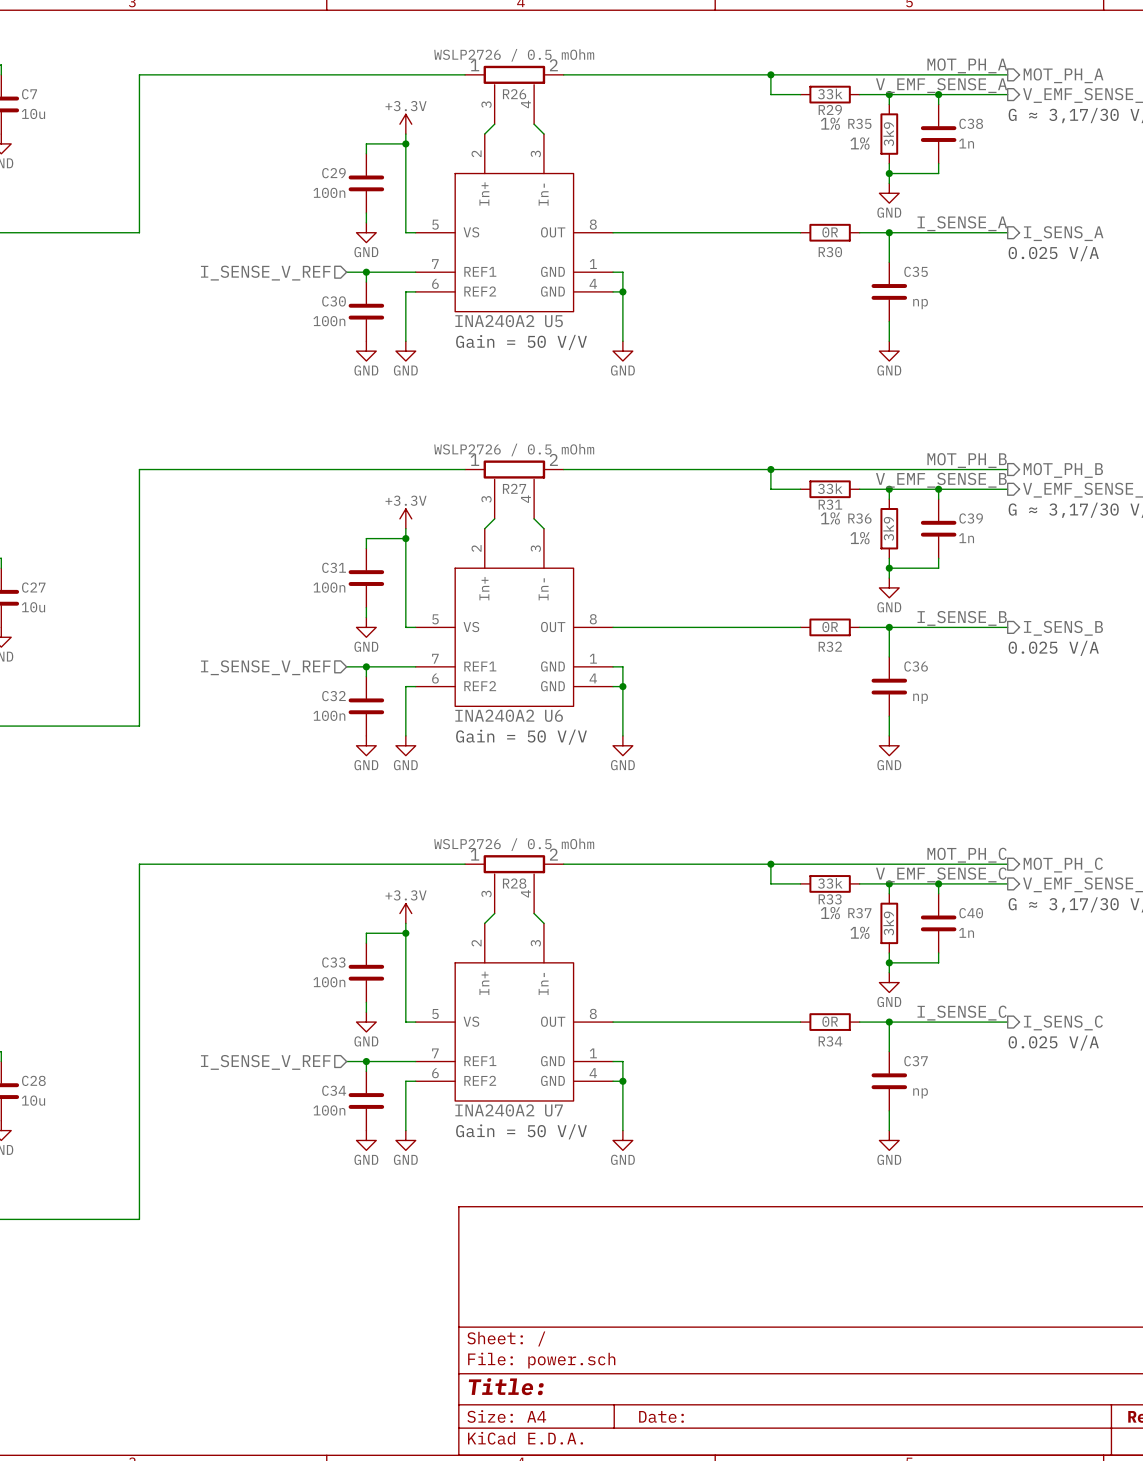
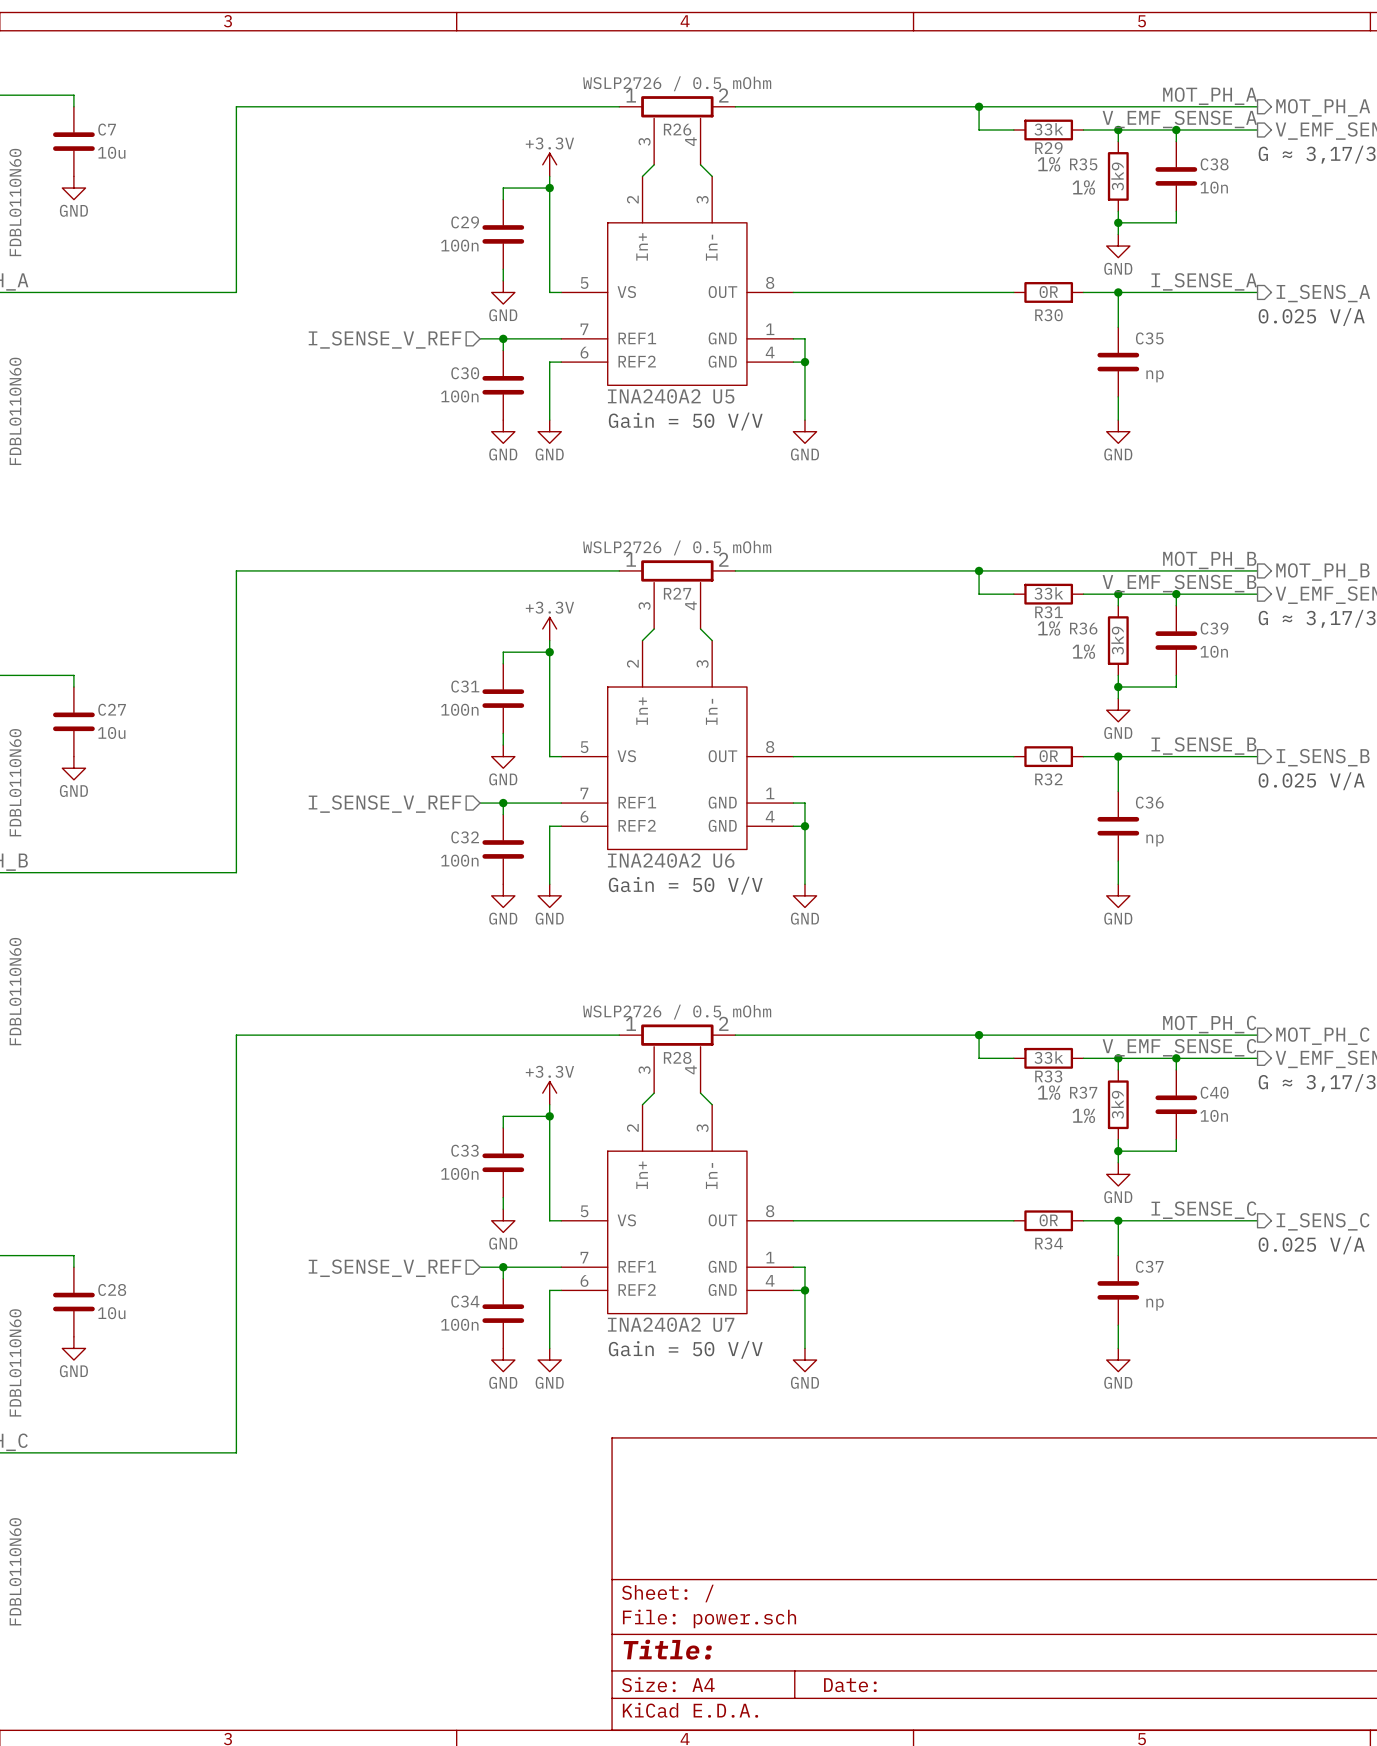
C38 value: 1n (966, 143) -> 10n (1214, 187)
C39 value: 1n (966, 538) -> 10n (1214, 651)
C40 value: 1n (966, 932) -> 10n (1214, 1115)

